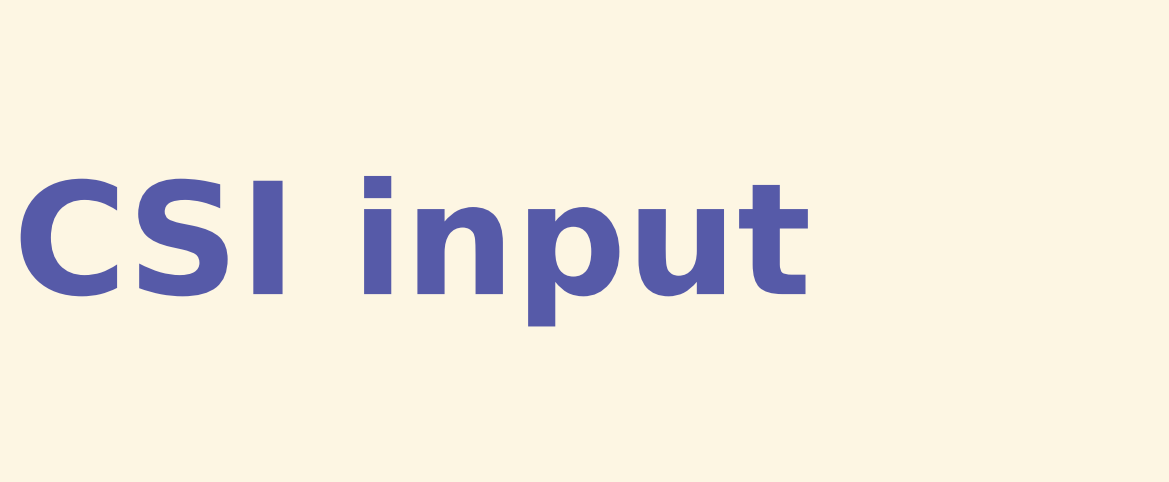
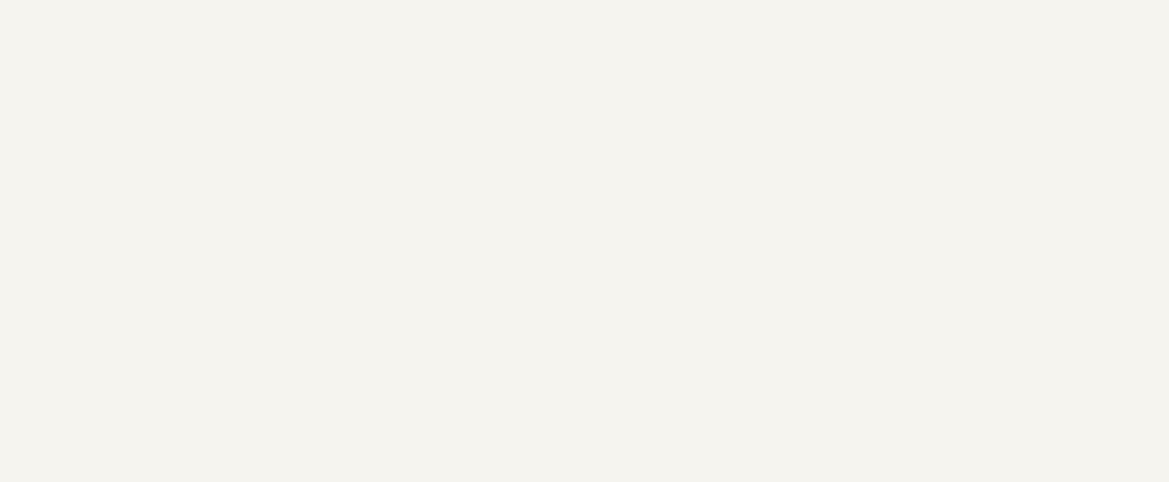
text: CSI input (414, 251) -> none

